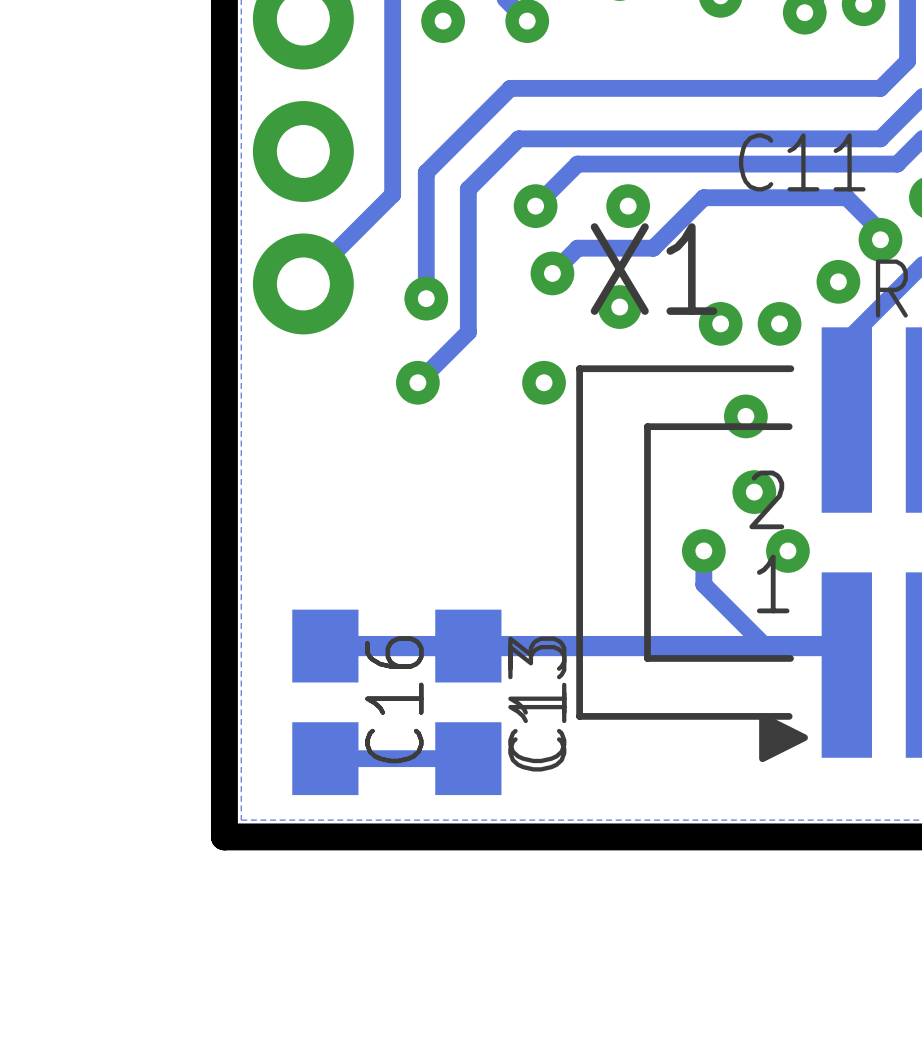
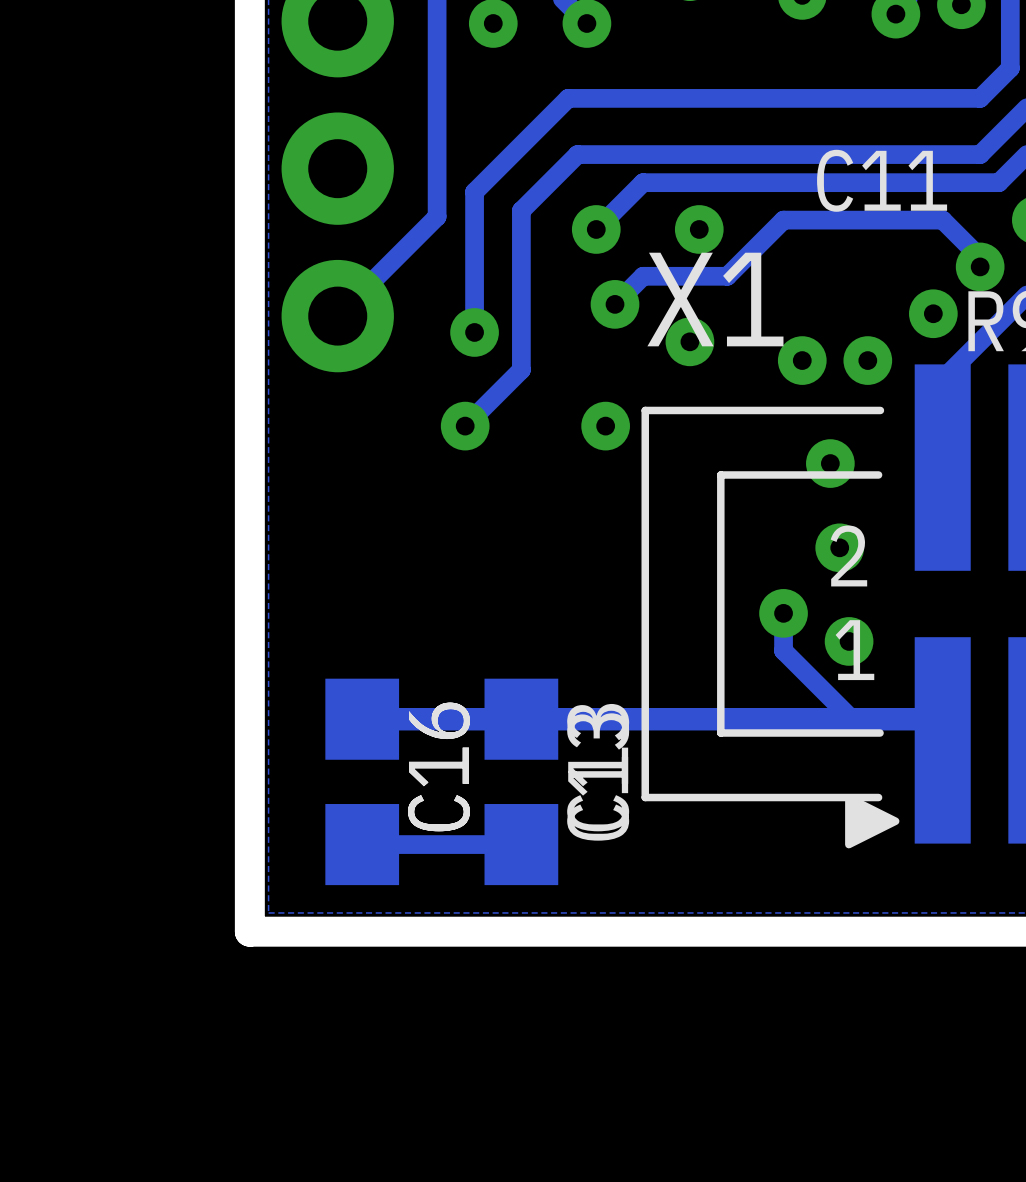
via position: (787, 550) -> (849, 641)

